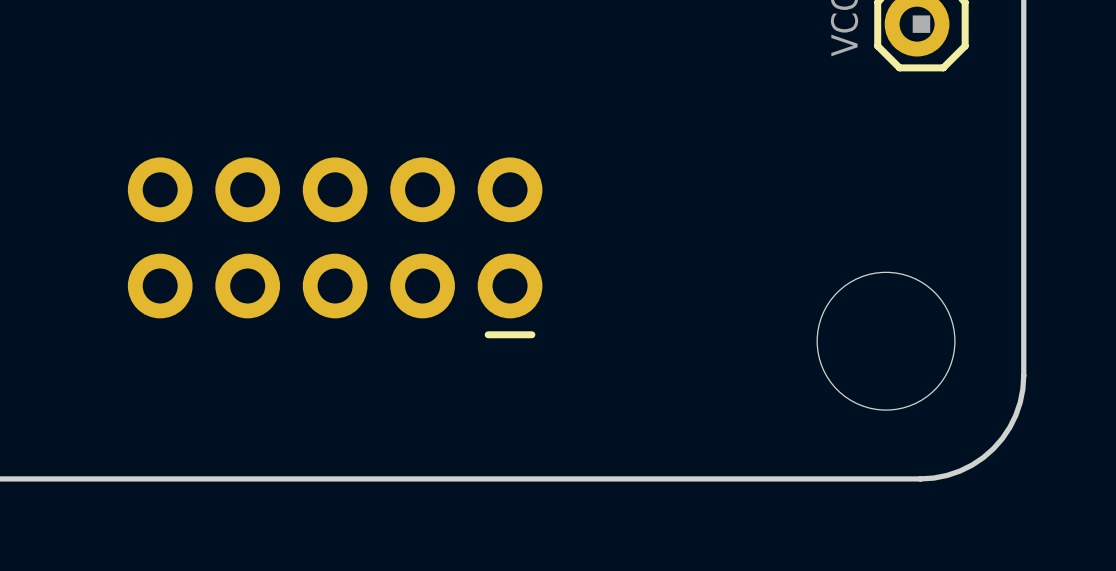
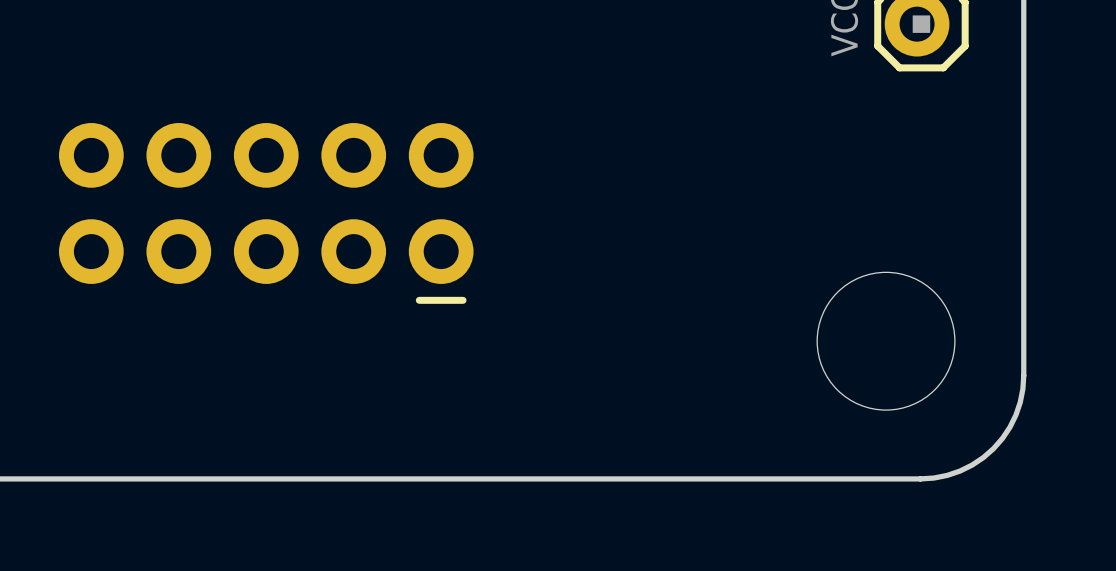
part position: (335, 247) -> (266, 213)

